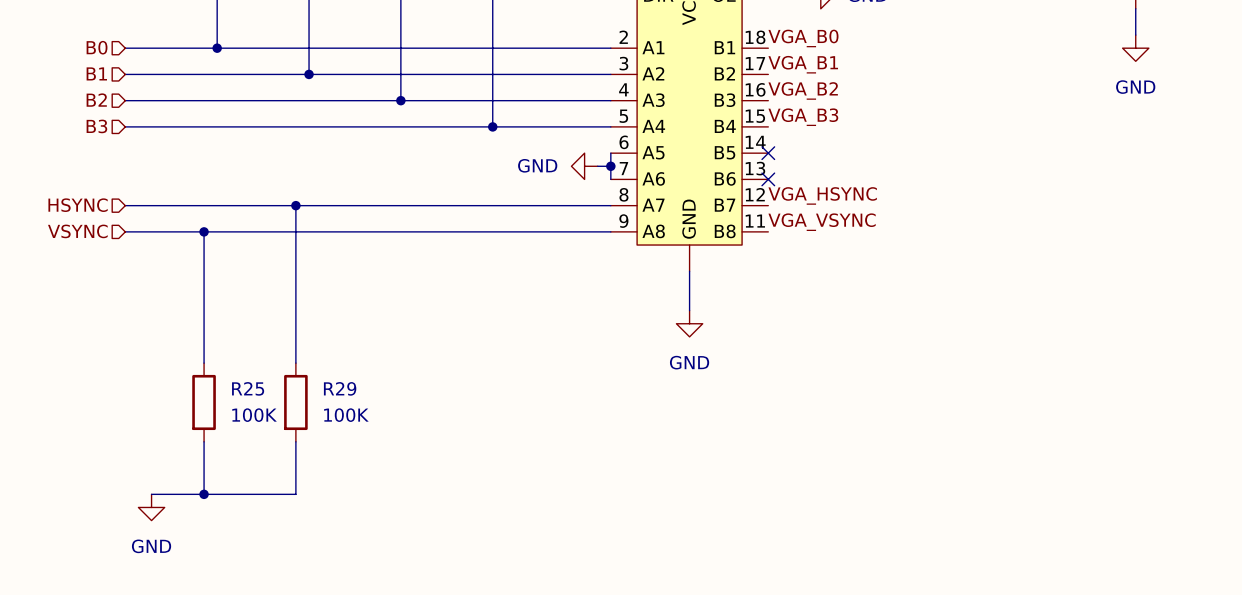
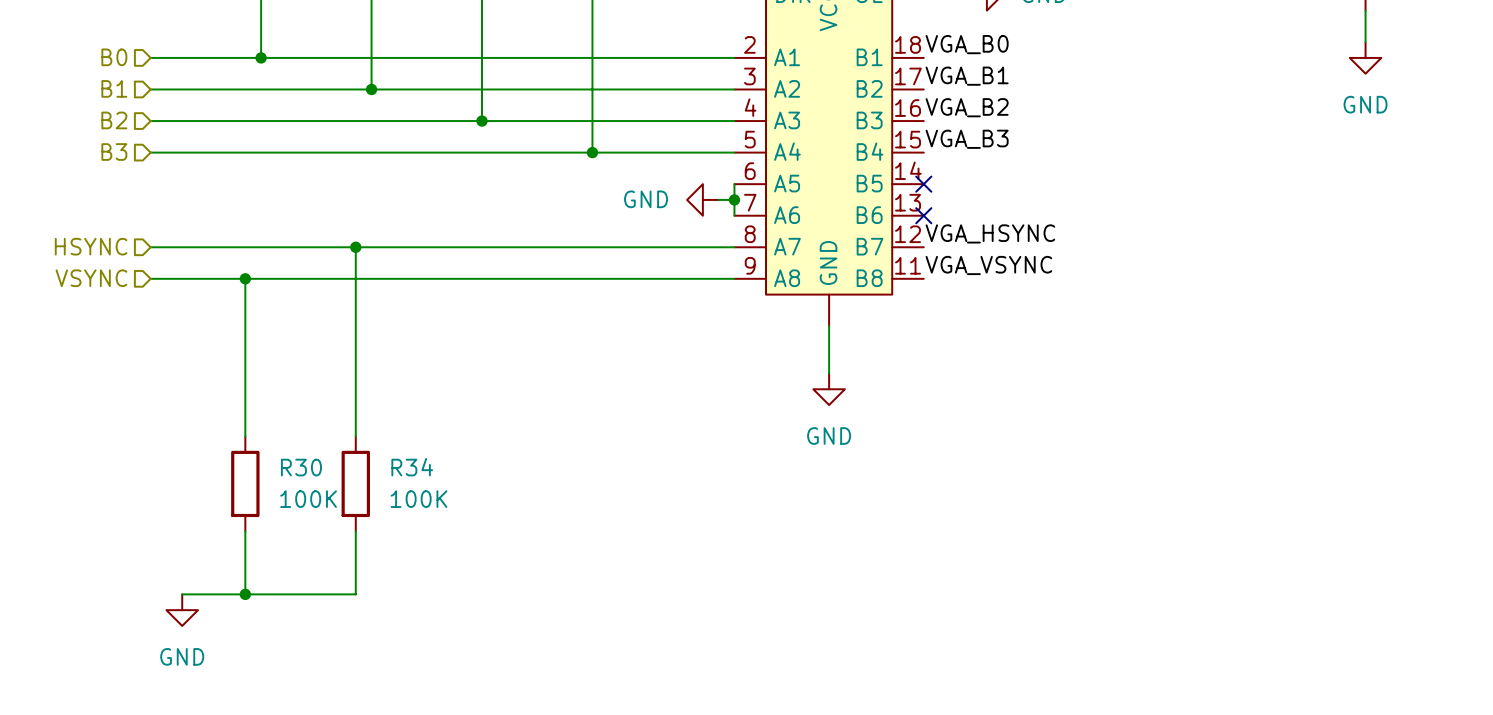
R25 name: R25 (248, 388) -> R30 (301, 467)
R29 name: R29 (340, 388) -> R34 (412, 467)

